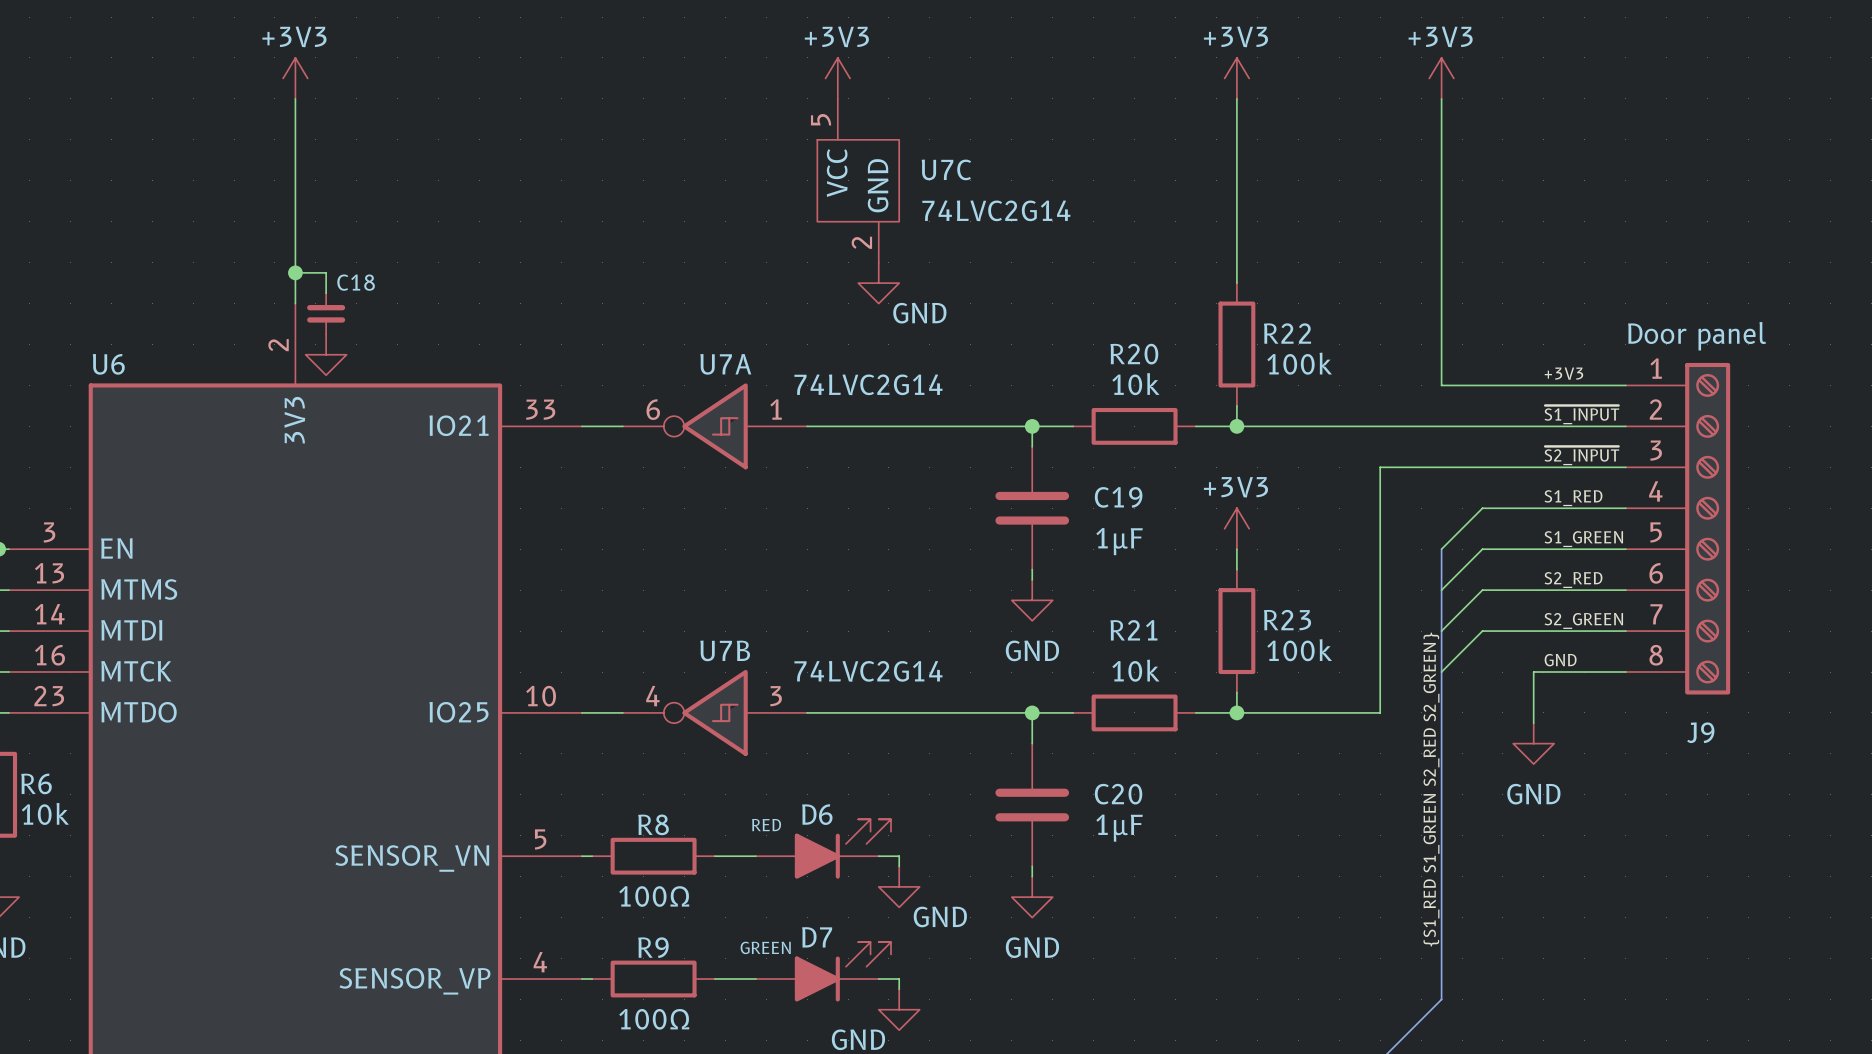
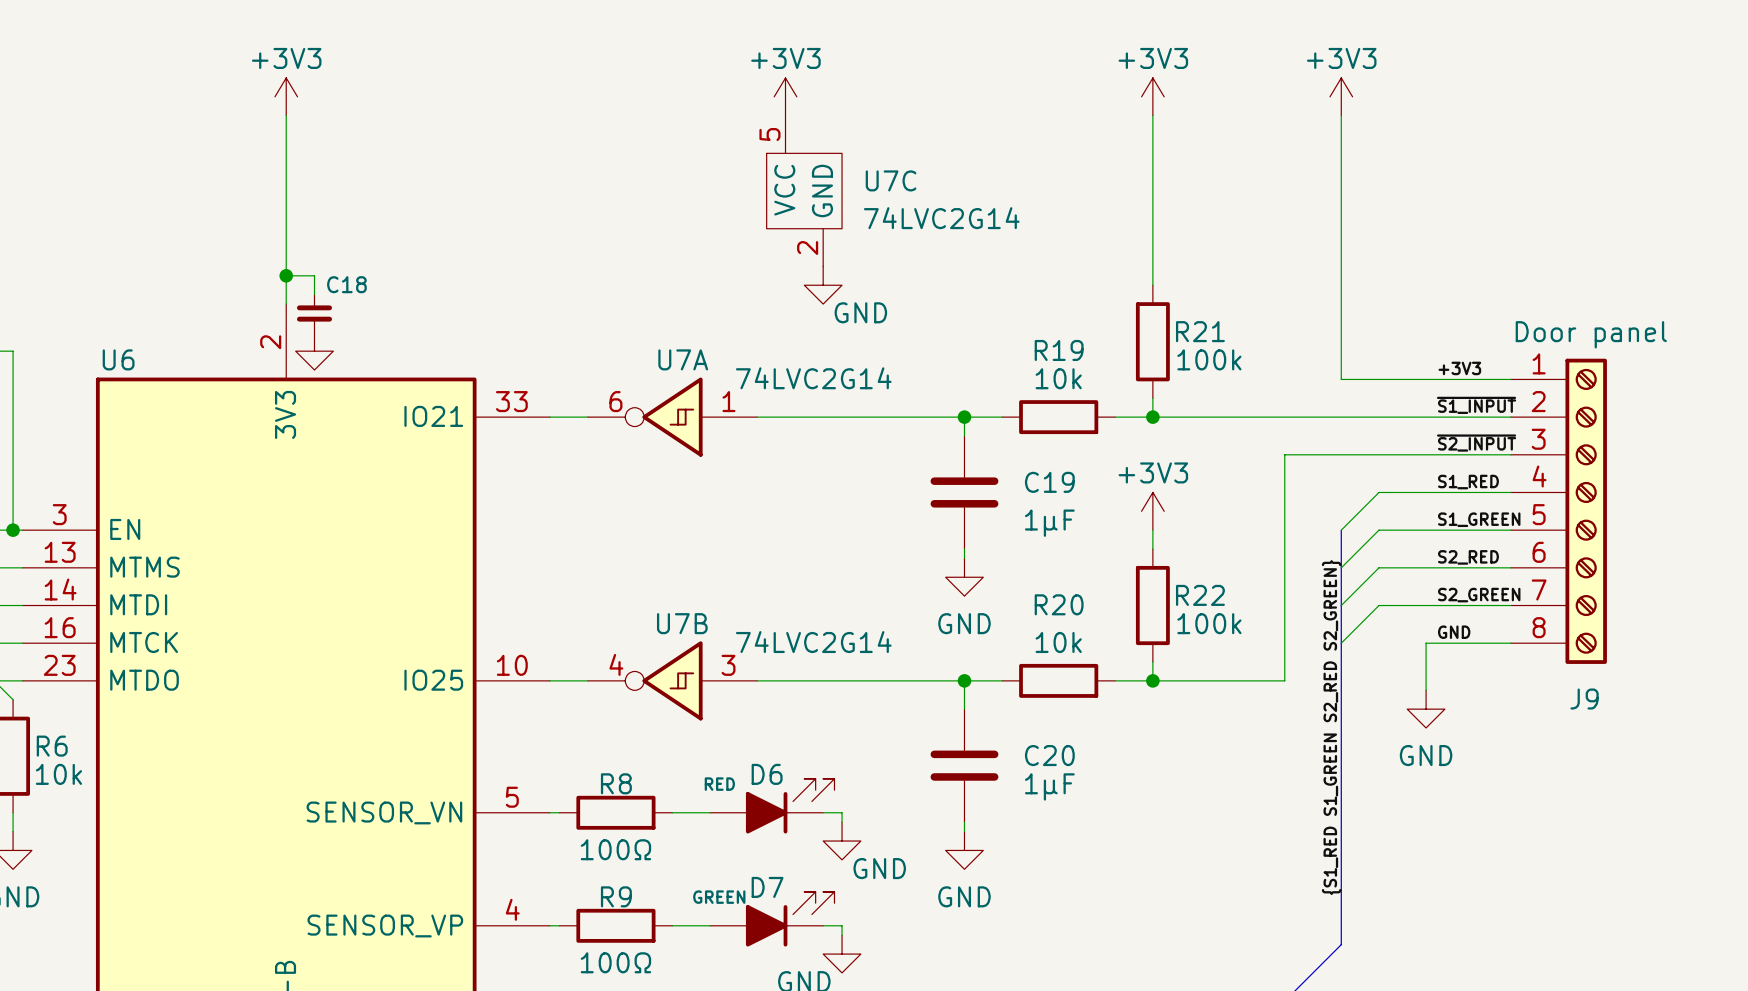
R22 name: R22 (1287, 333) -> R21 (1200, 331)
R20 name: R20 (1134, 354) -> R19 (1059, 350)
R23 name: R23 (1287, 620) -> R22 (1200, 595)
R21 name: R21 (1133, 630) -> R20 (1059, 604)

